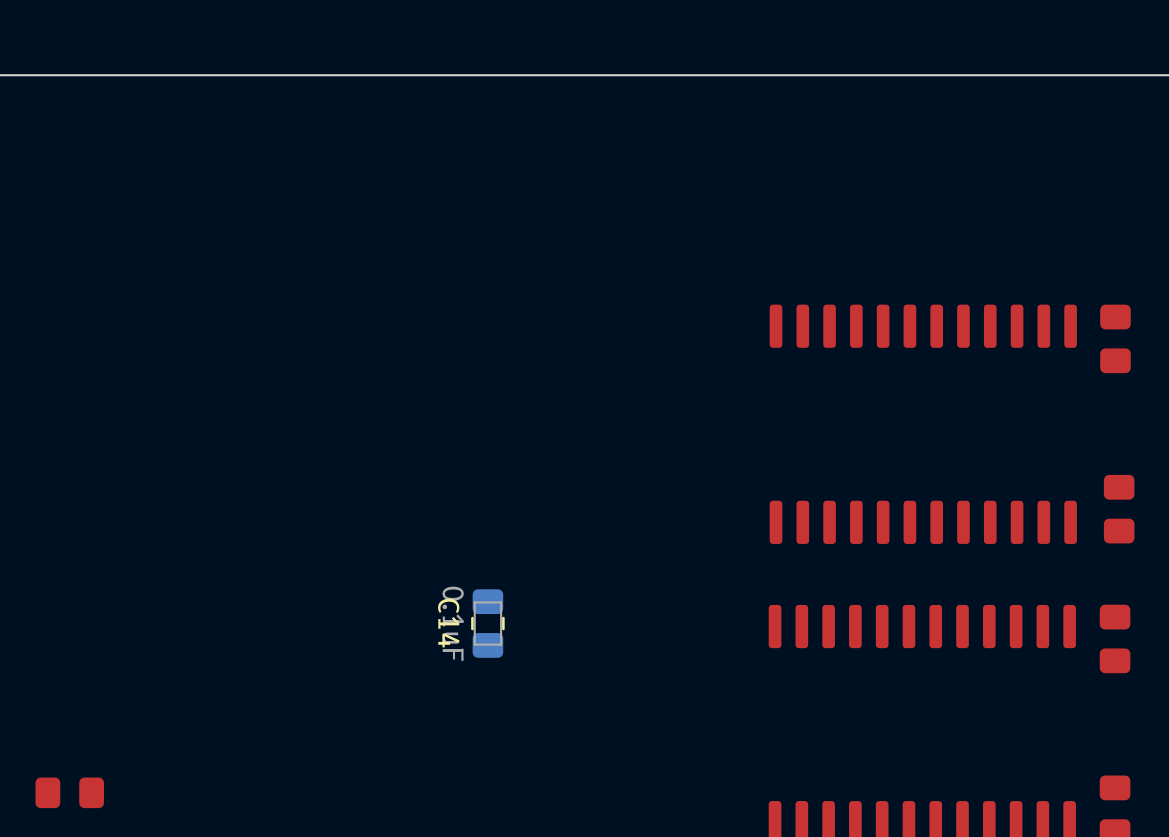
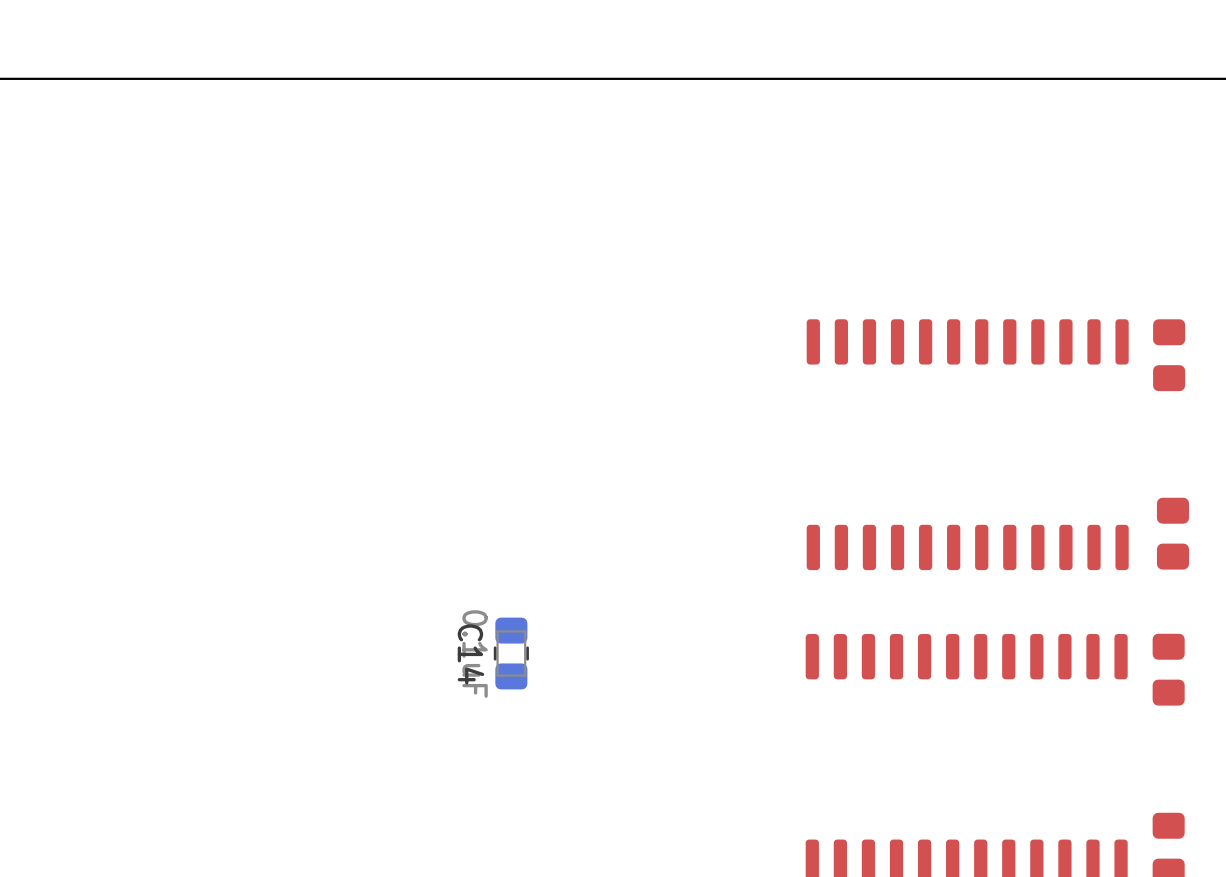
part: (69, 792) -> none

